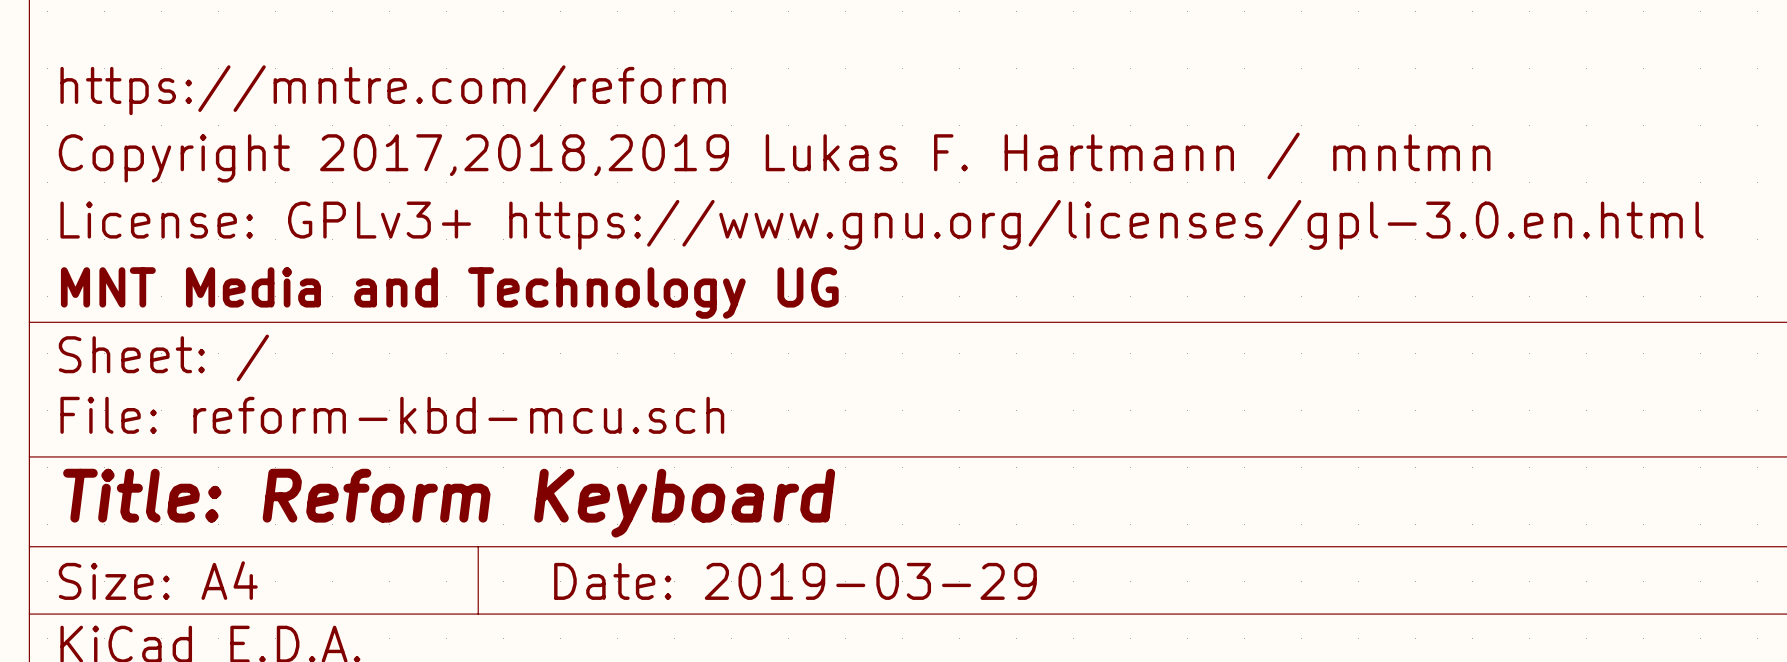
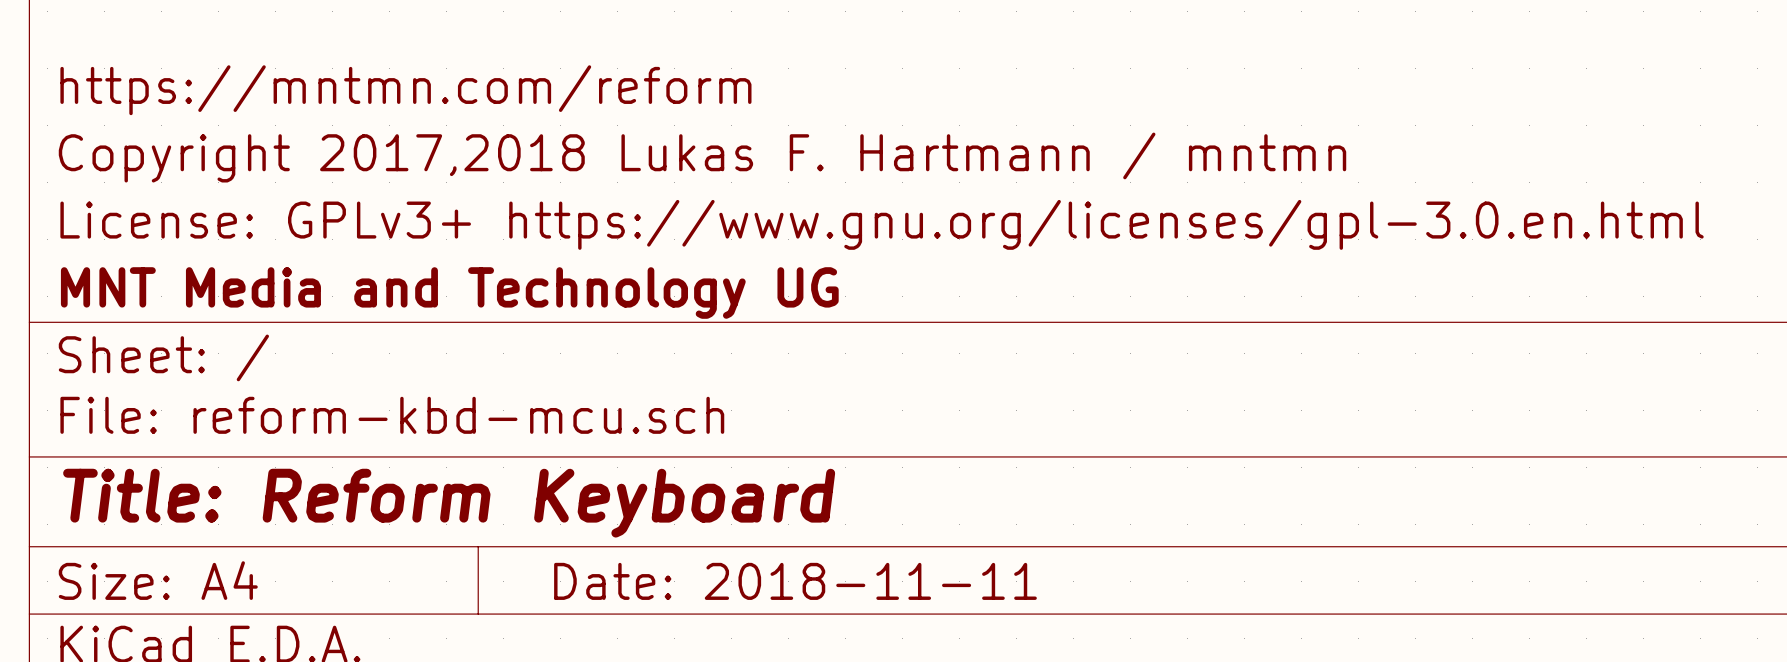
title block: https://mntre.com/reform (393, 90) -> https://mntmn.com/reform (405, 90)
title block: Copyright 2017,2018,2019 Lukas F. Hartmann / mntmn (774, 157) -> Copyright 2017,2018 Lukas F. Hartmann / mntmn (702, 157)
title block: Date: 2019-03-29 (795, 581) -> Date: 2018-11-11 (795, 581)

